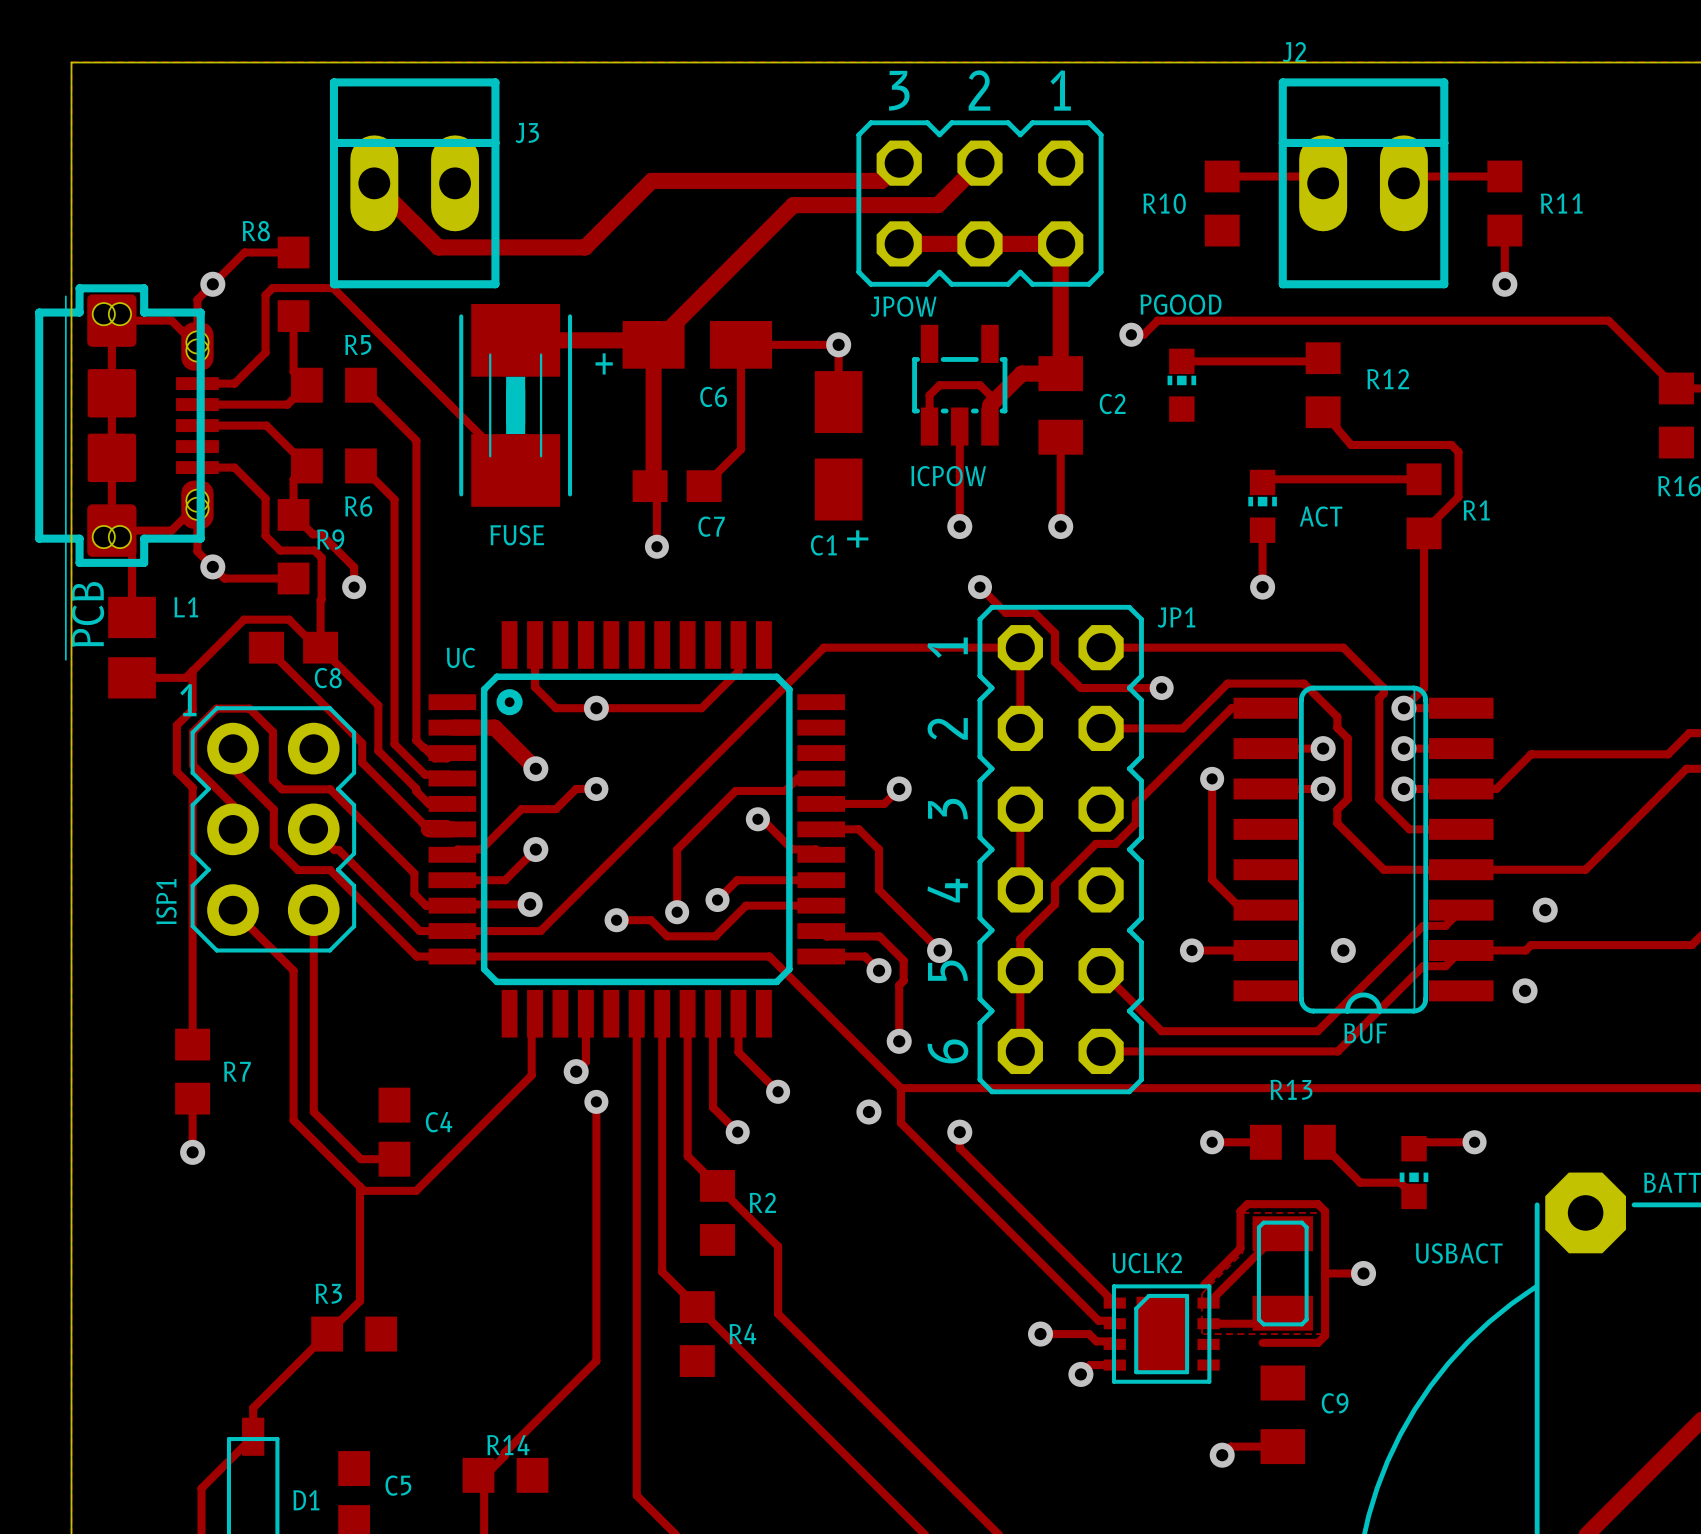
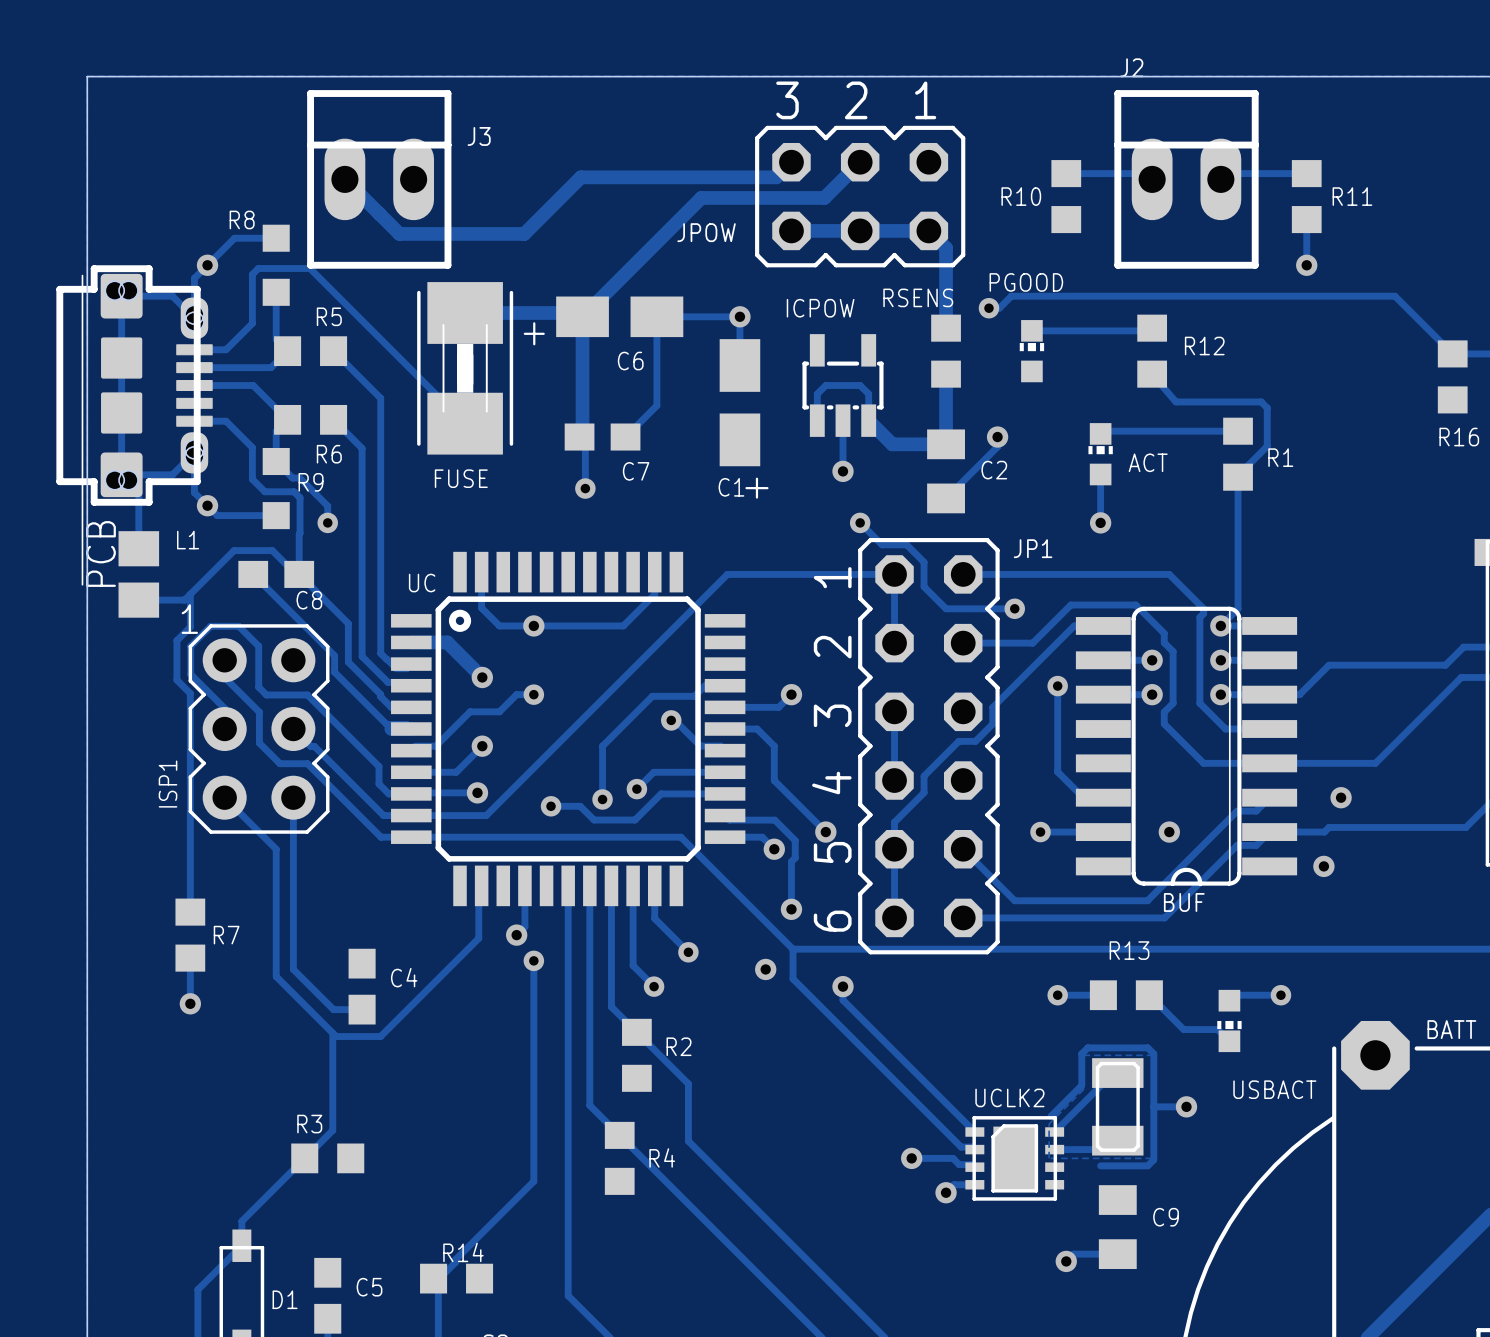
track: (1060, 243) (1060, 373) (1021, 373) (989, 405) -> (928, 230) (946, 248) (946, 328)
JPOW name position: JPOW (903, 306) -> JPOW (706, 232)
ICPOW position: (959, 385) -> (843, 385)
RSENS: none -> (946, 351)
C2 position: (1060, 405) -> (946, 471)
track: none -> (946, 374) (946, 444) (892, 444) (868, 420) (868, 394) (860, 385) (825, 385) (817, 394) (817, 420)
track: (929, 426) (929, 395) (939, 385) (979, 385) (989, 395) (989, 426) -> none
track: (959, 426) (959, 466) -> none
track: (1060, 437) (1060, 526) -> none
ICPOW name position: ICPOW (948, 476) -> ICPOW (820, 308)
track: none -> (997, 437) (997, 446) (946, 498)
via position: (1060, 526) -> (997, 437)

